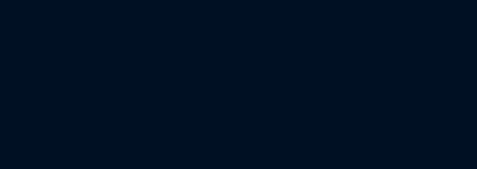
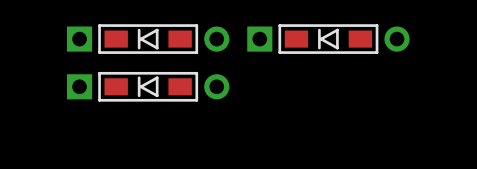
part: none -> (148, 39)
part: none -> (328, 39)
part: none -> (148, 86)

